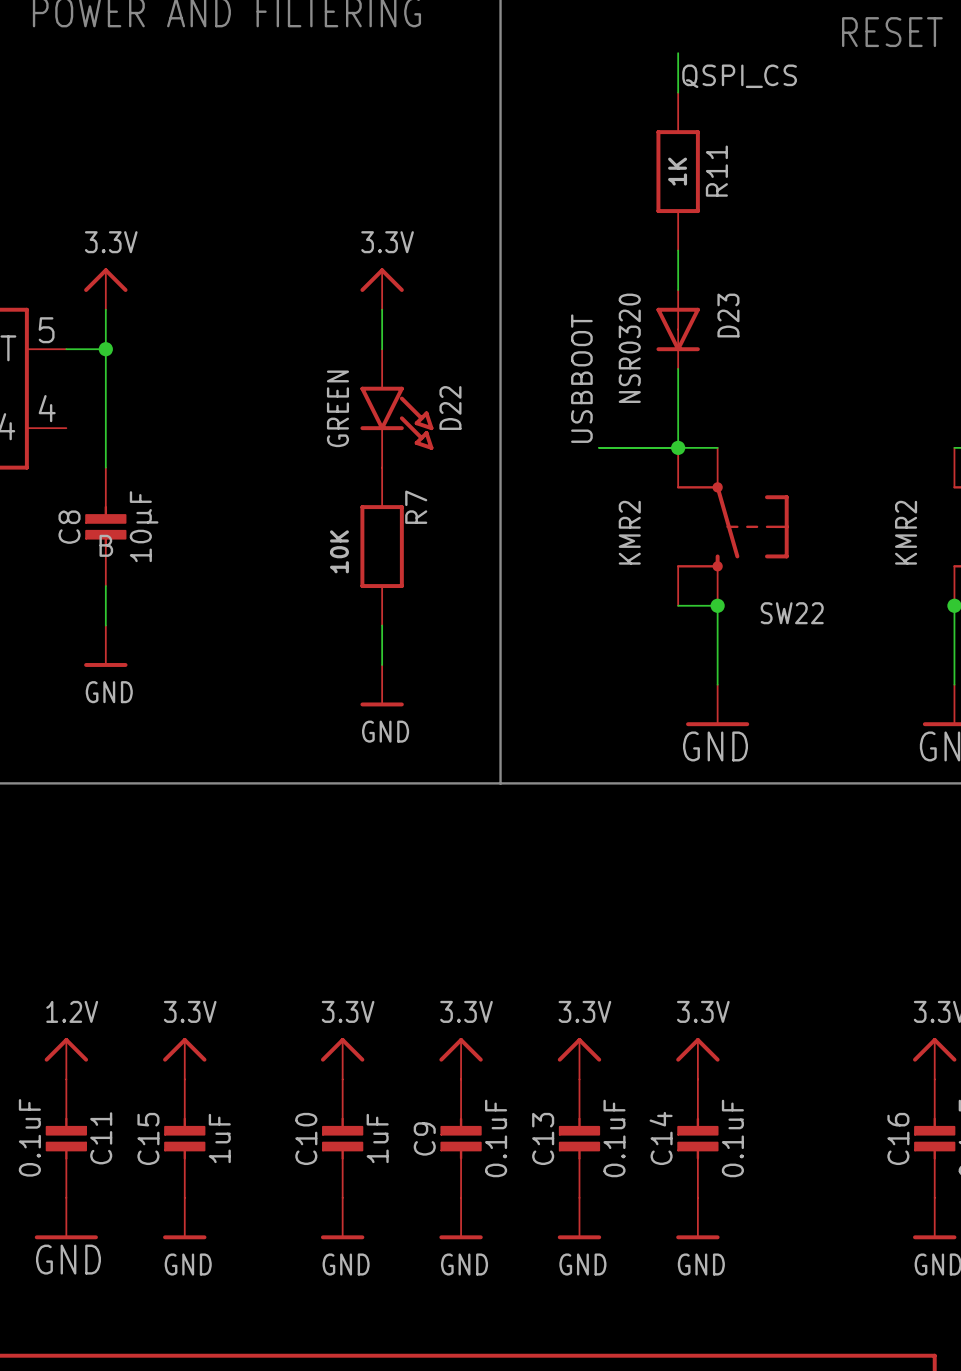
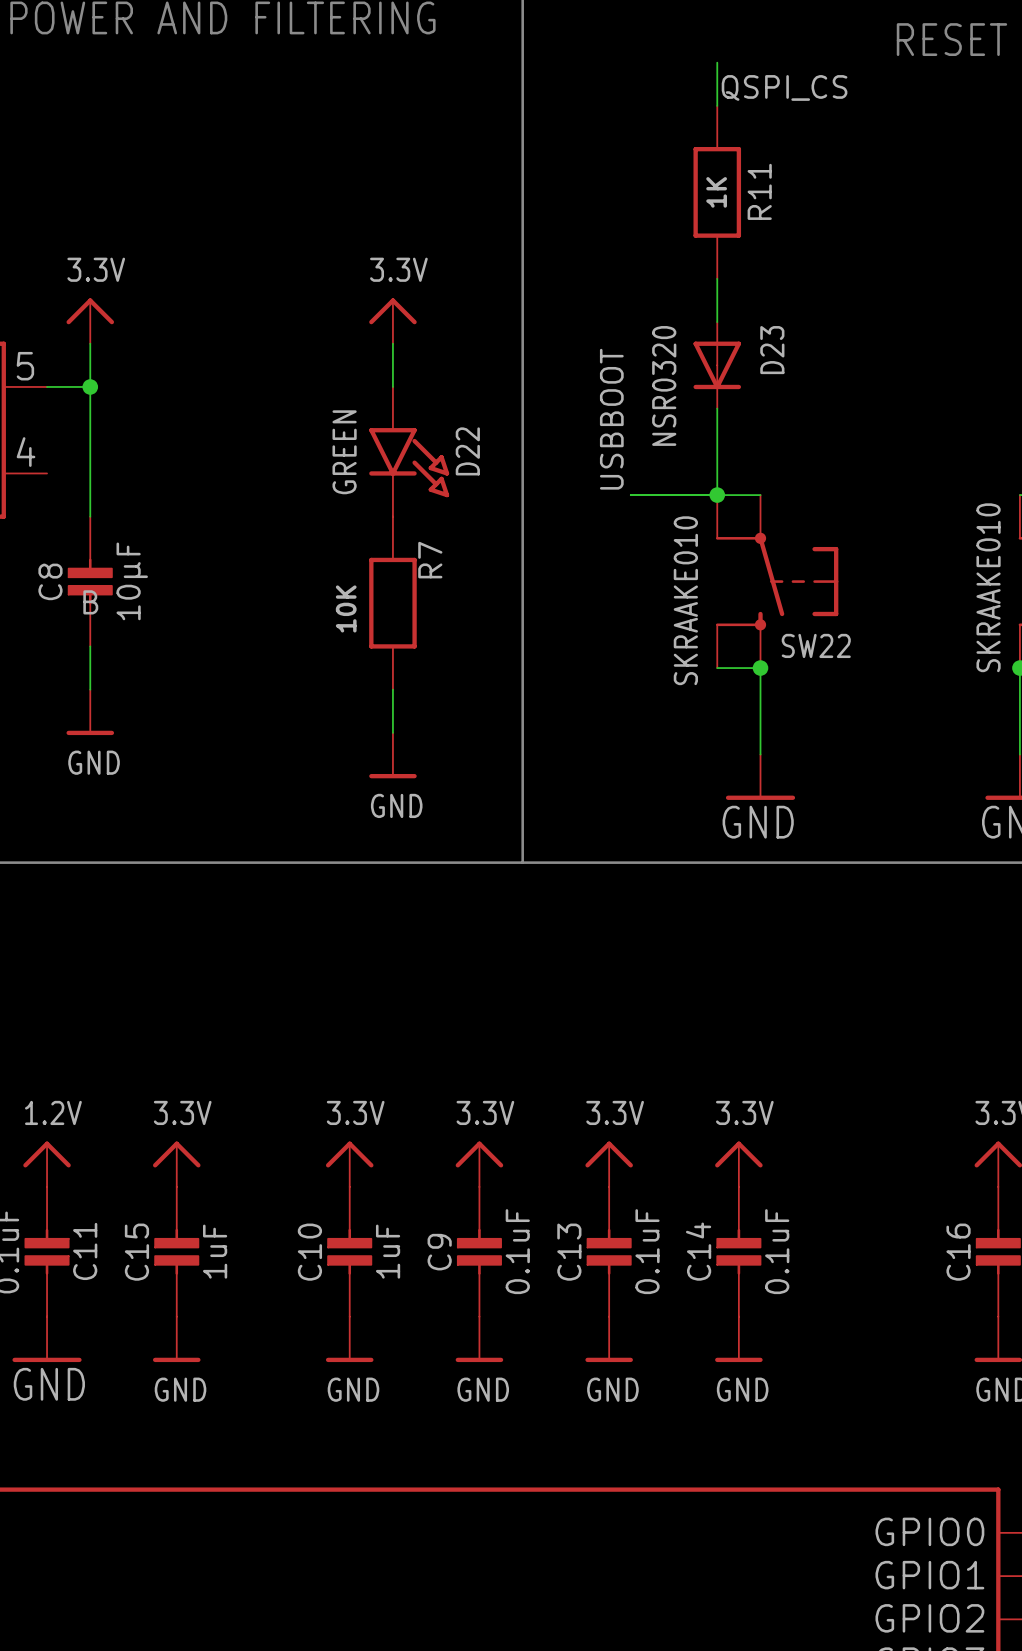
SW22 value: KMR2 (629, 532) -> SKRAAKE010 (685, 600)
part value: KMR2 (906, 532) -> SKRAAKE010 (988, 587)
SW22 name position: SW22 (792, 613) -> SW22 (816, 645)

